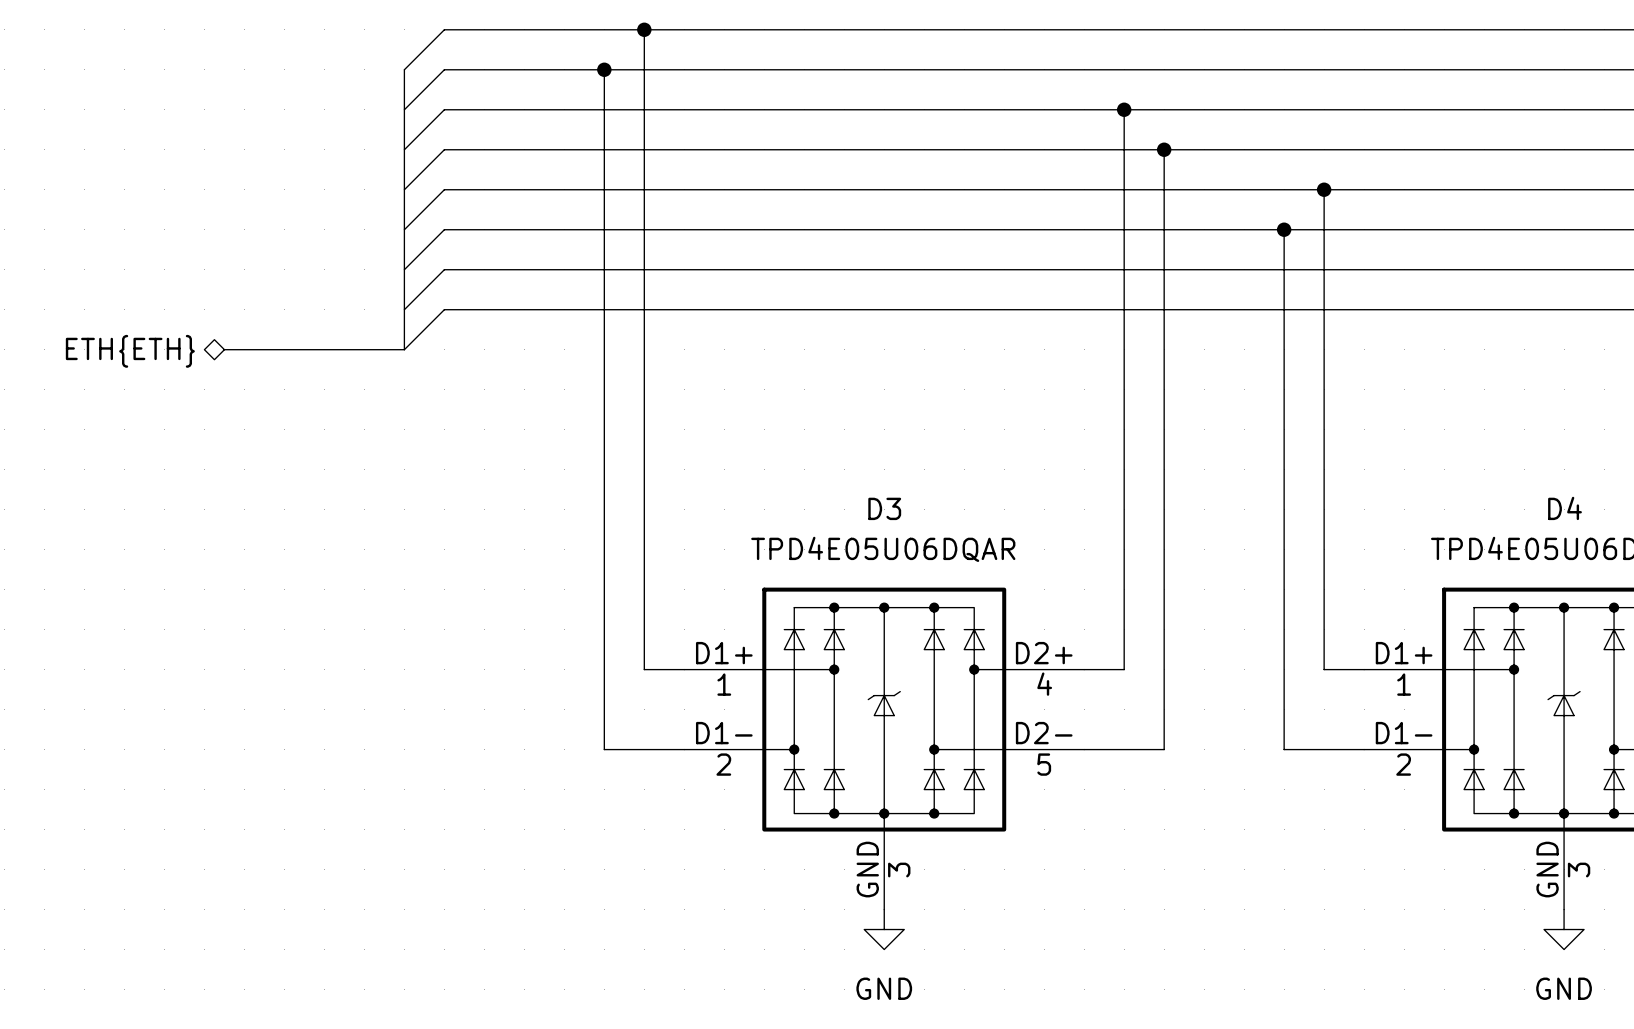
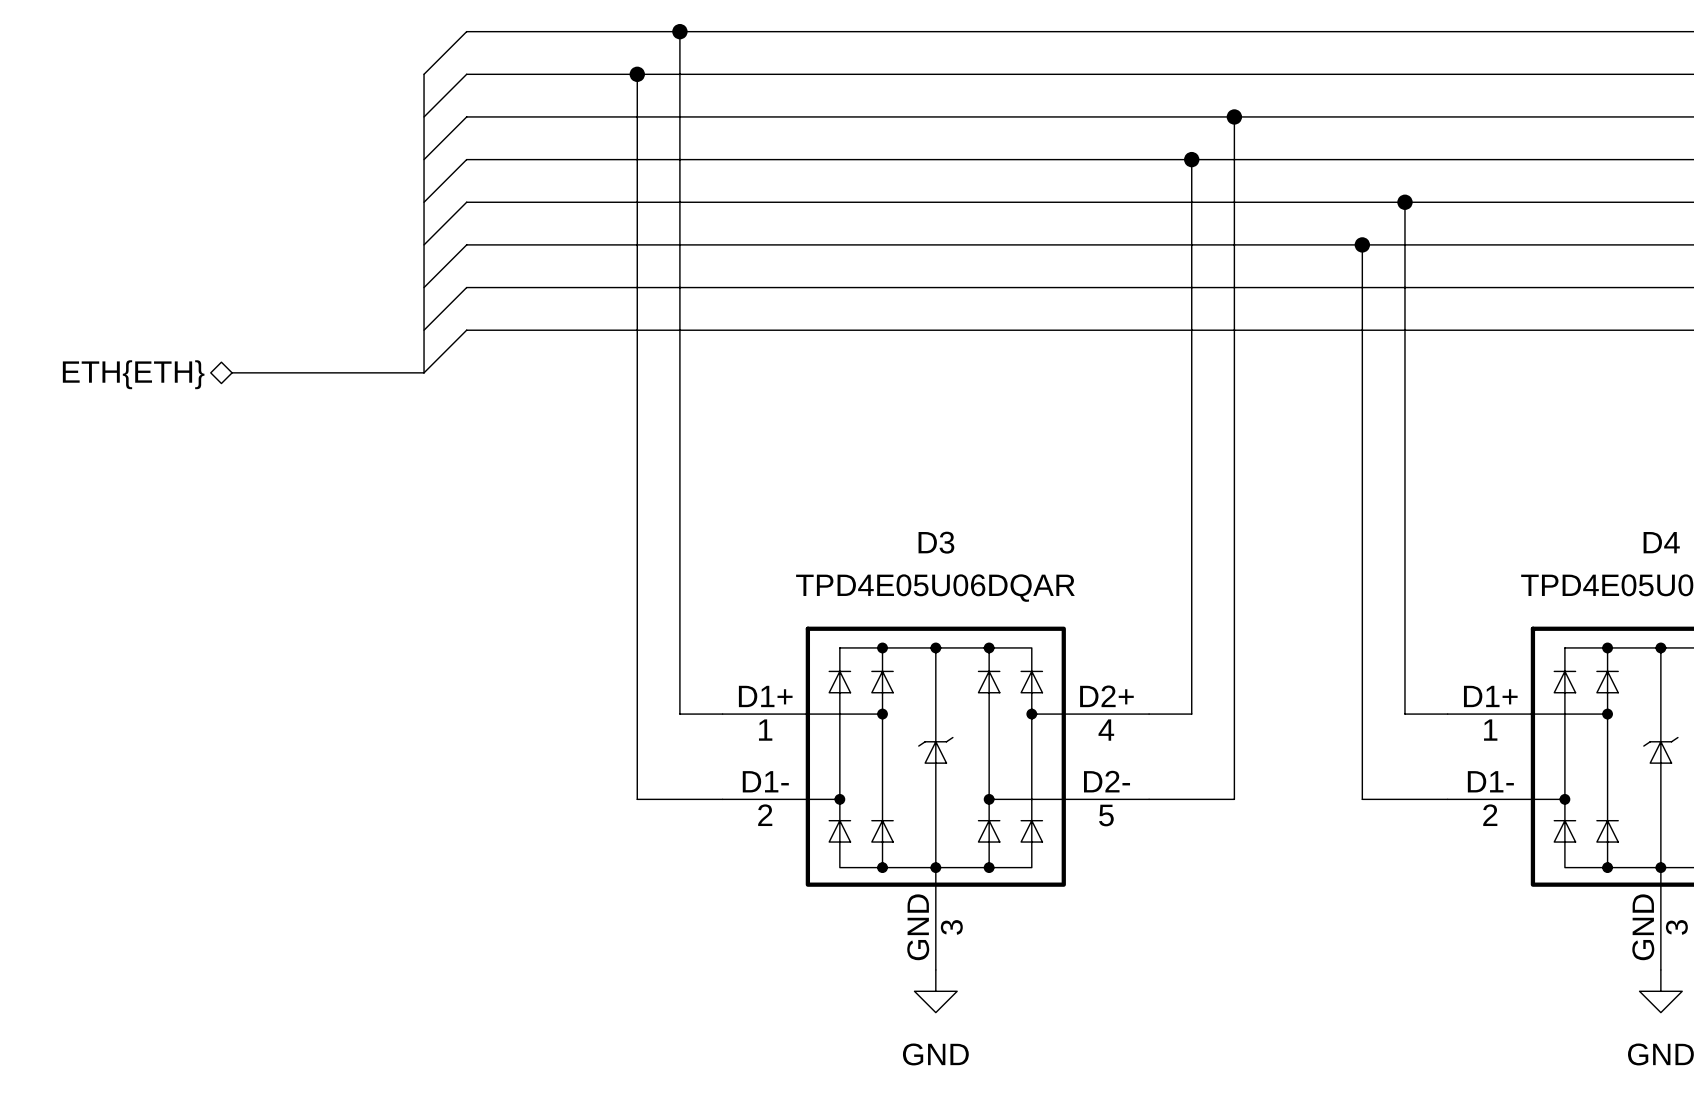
wire: (1124, 109) (1124, 149) -> (1234, 116) (1234, 159)
junction: (1124, 109) -> none
junction: none -> (1234, 116)
junction: none -> (1191, 159)
junction: (1164, 149) -> none

